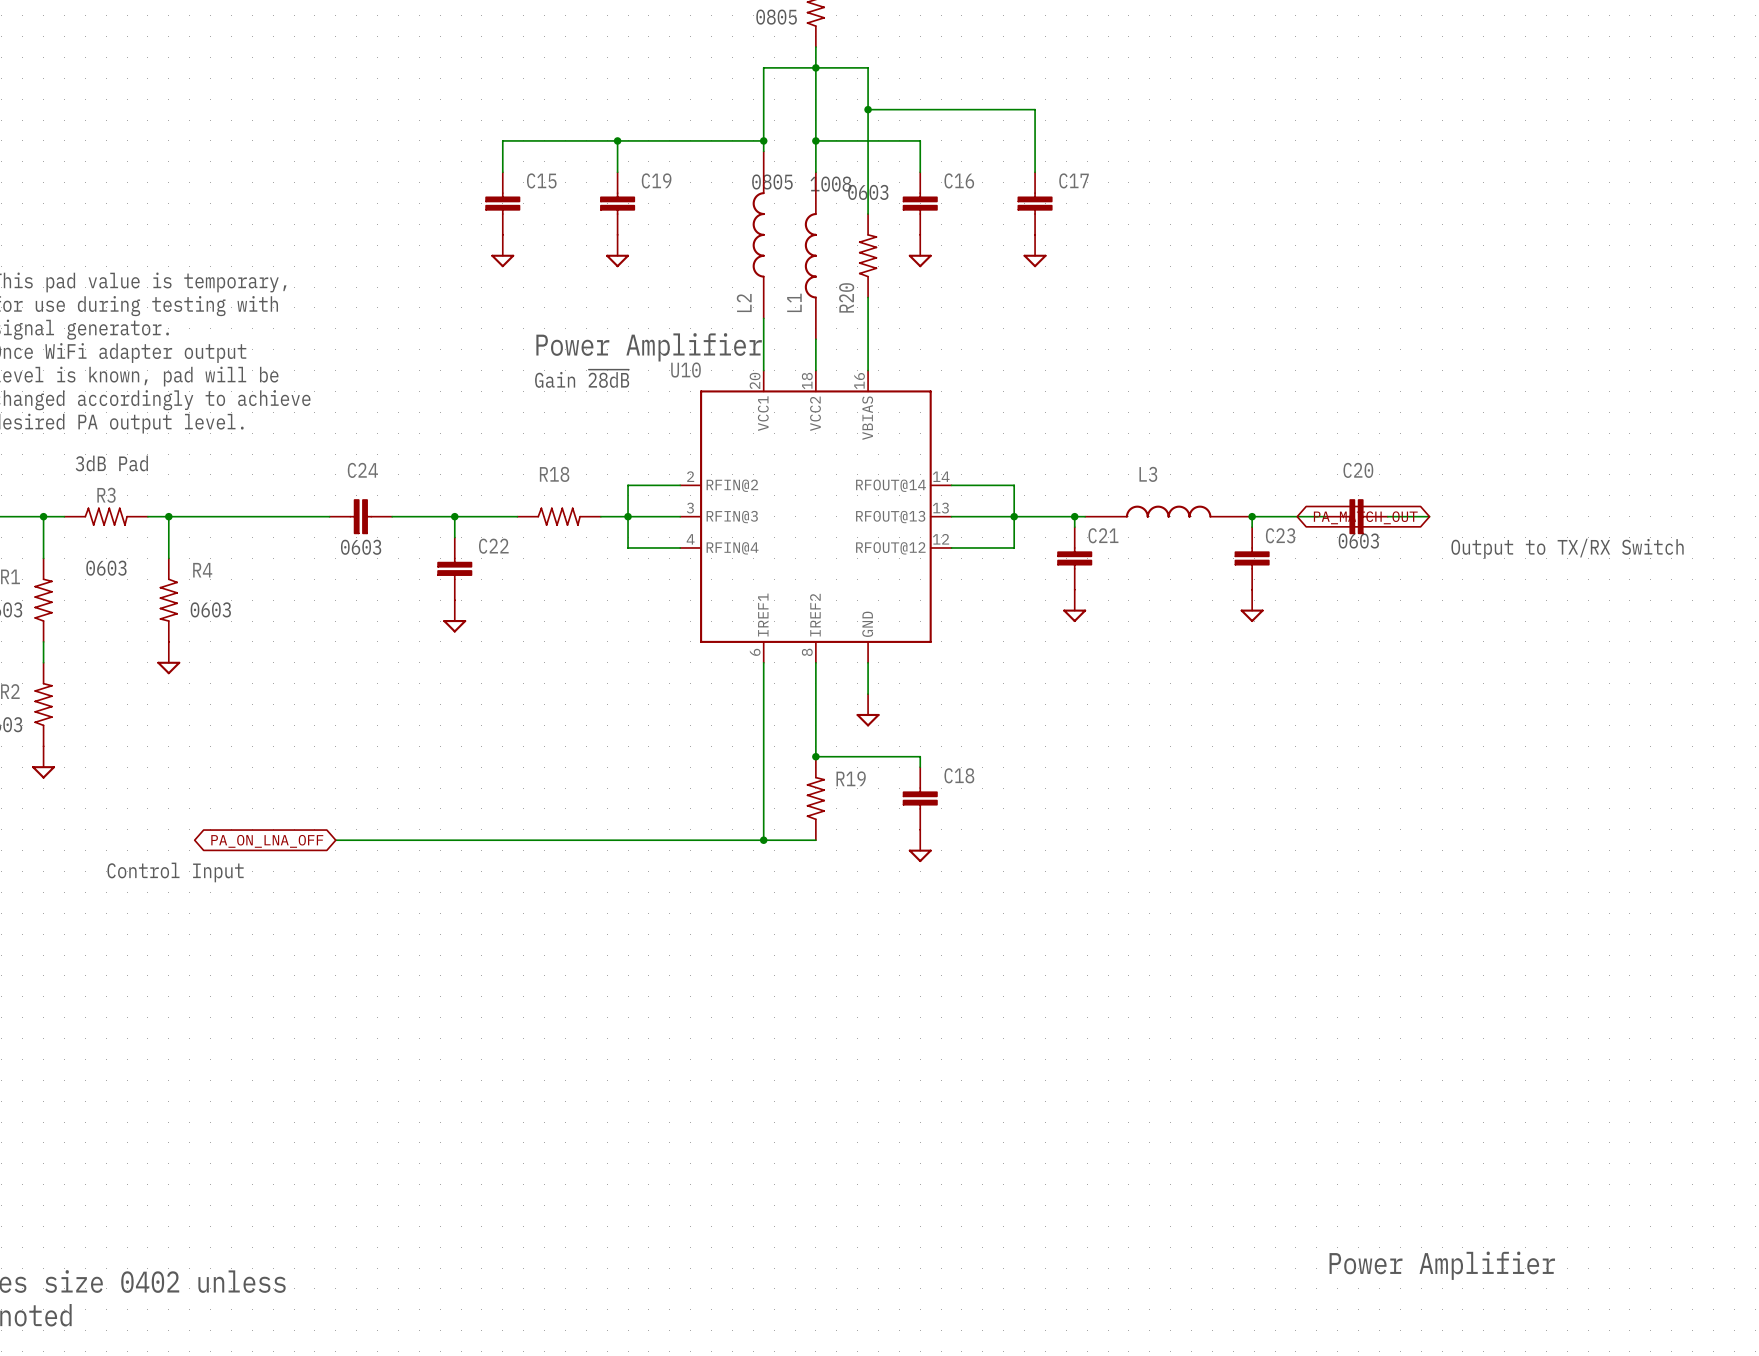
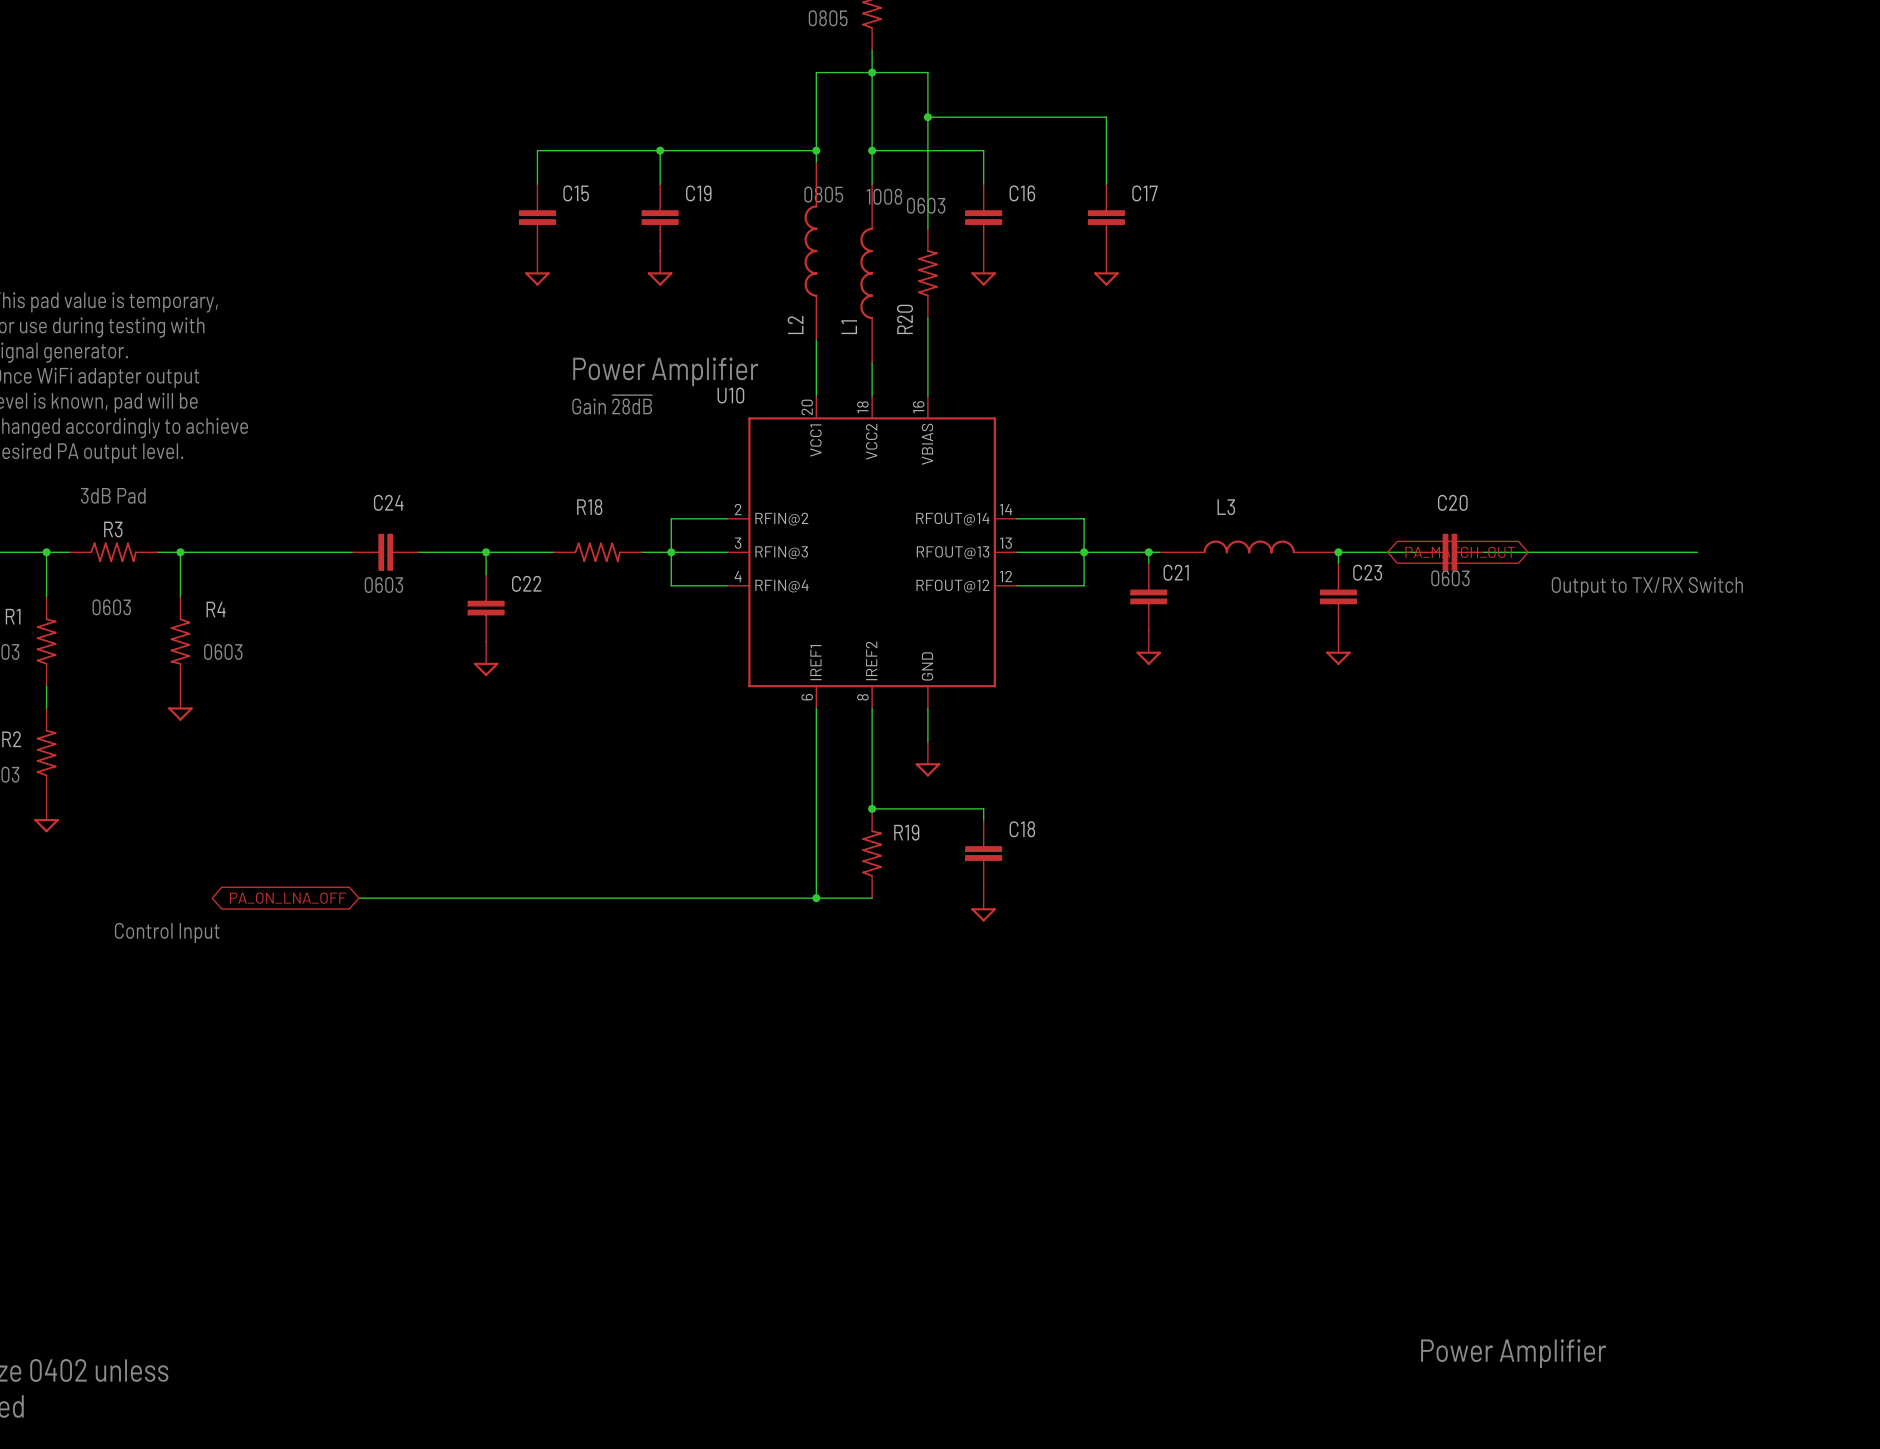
wire: none -> (1528, 552) (1697, 552)

